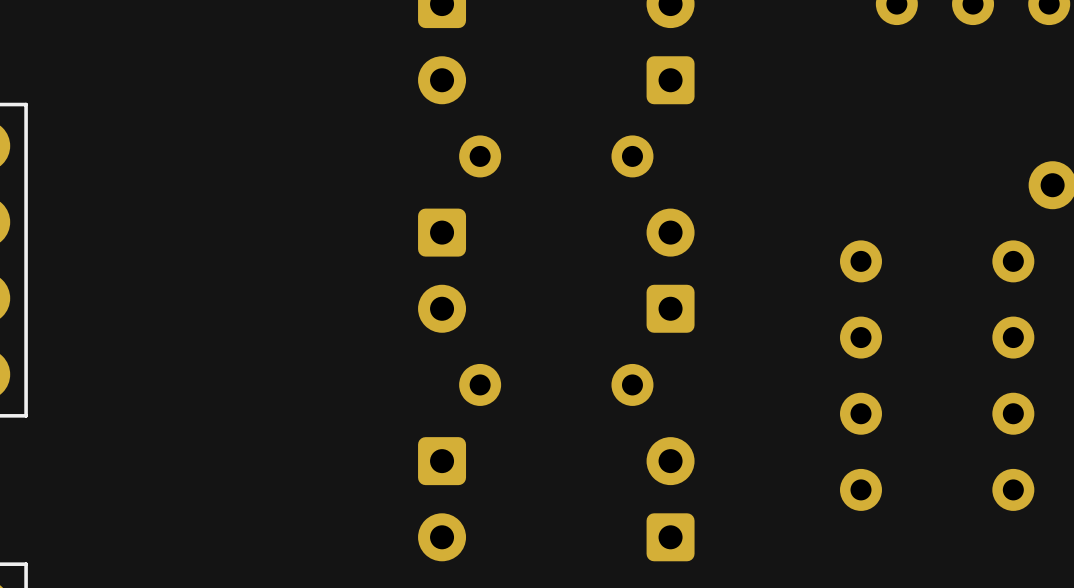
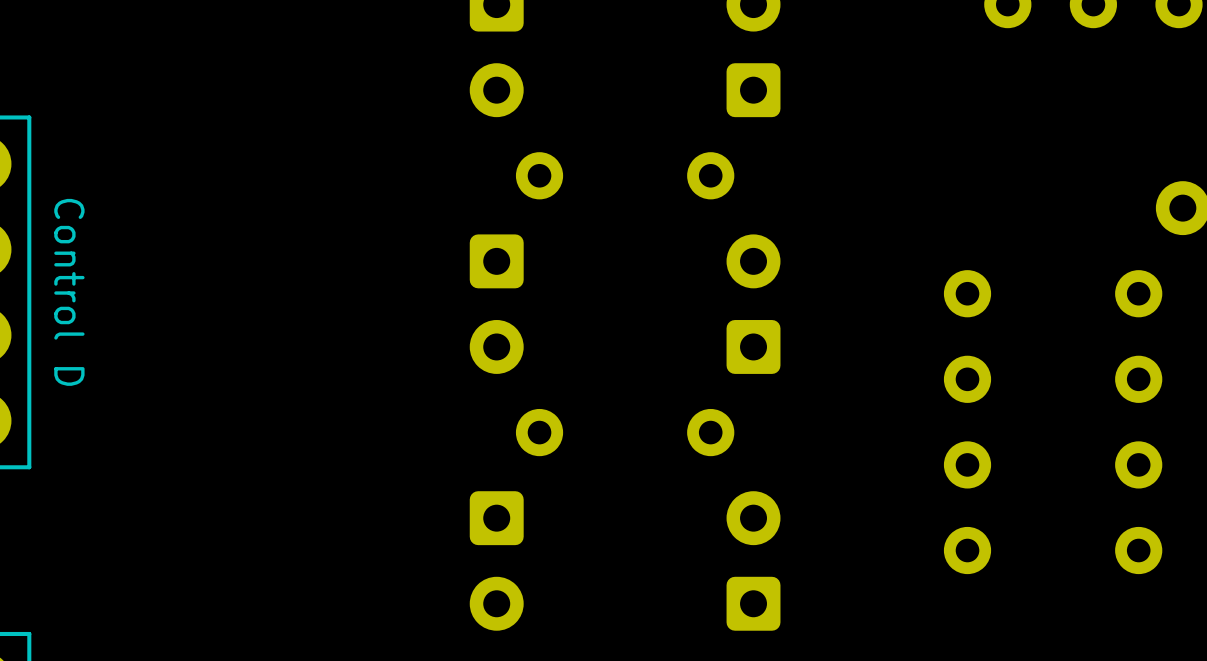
part value: none -> Control D (69, 292)

